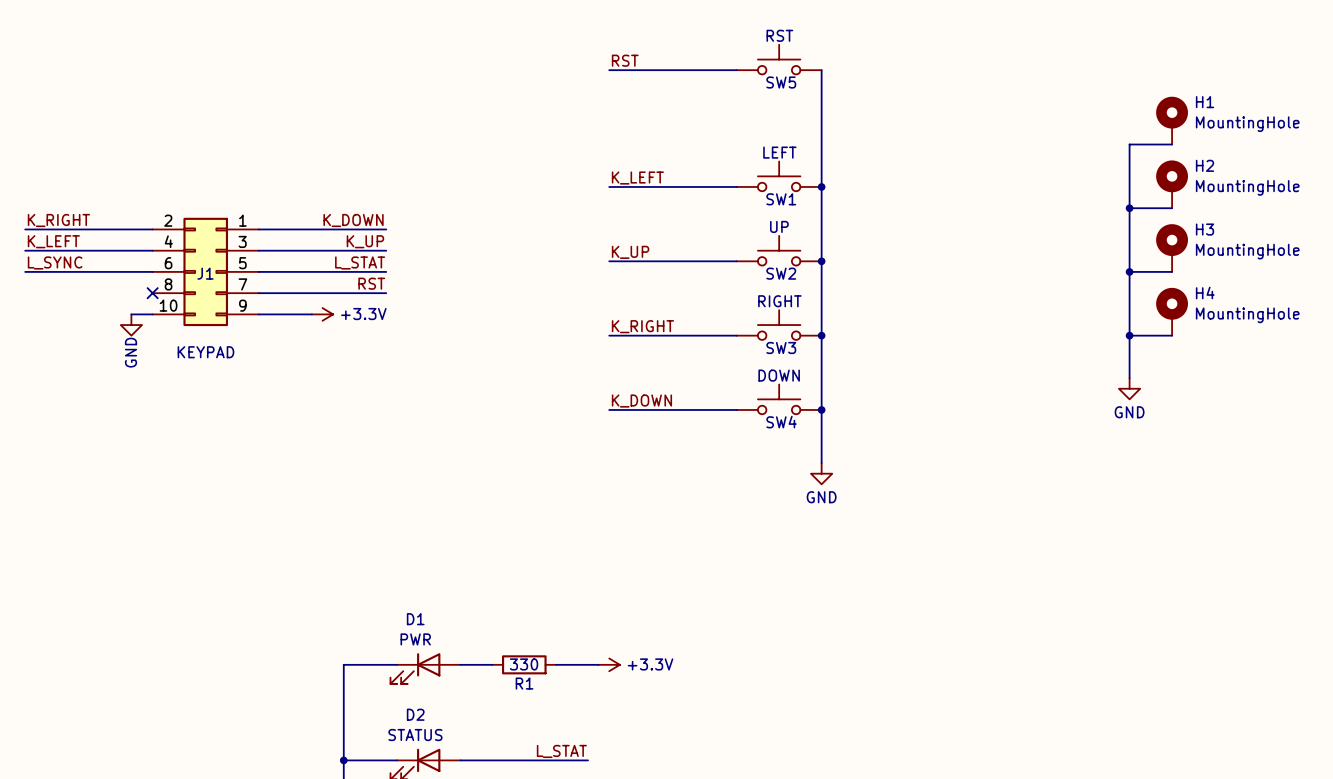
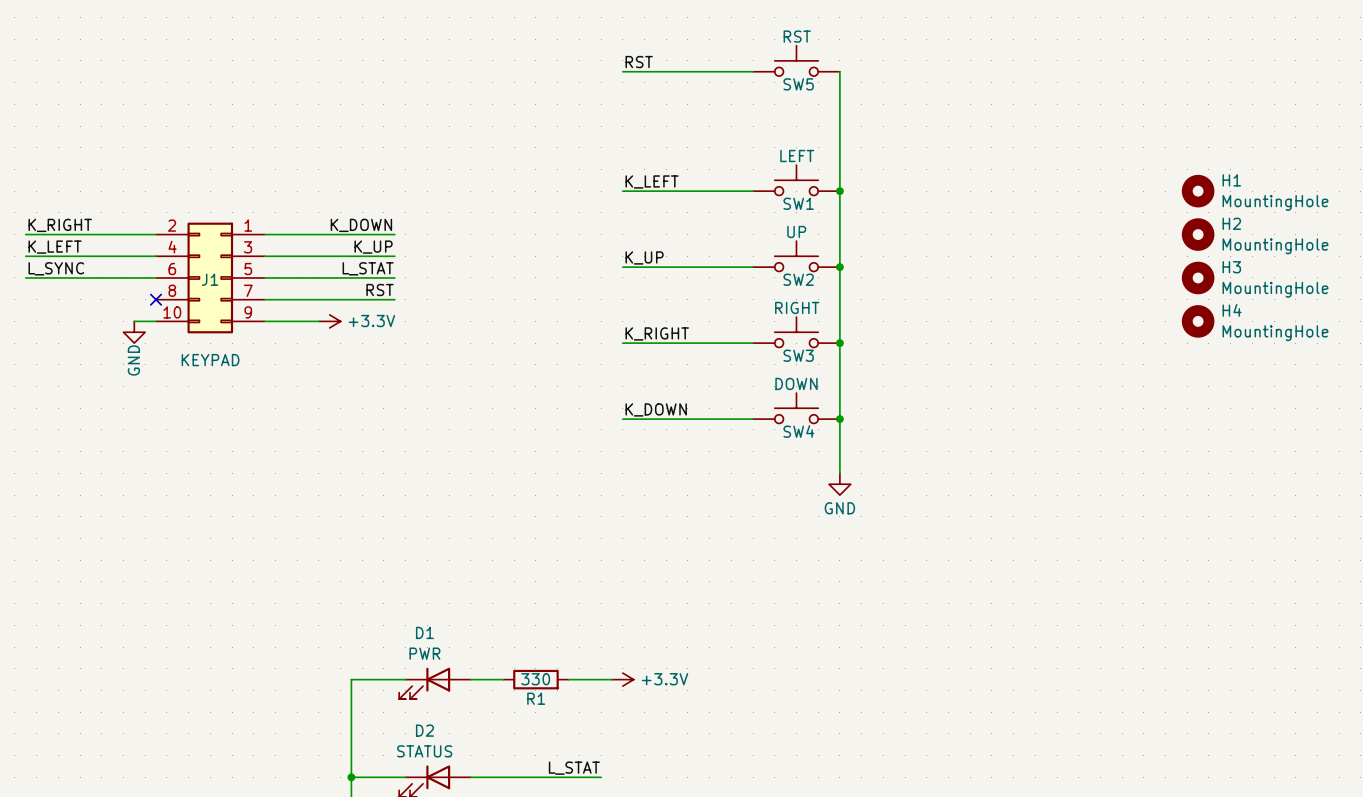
H1 symbol: [1156, 96, 1188, 145] -> [1181, 174, 1215, 208]
wire: (1172, 144) (1129, 144) (1129, 378) -> none
H2 symbol: [1156, 160, 1188, 209] -> [1181, 218, 1215, 251]
wire: (1129, 208) (1172, 208) -> none
junction: (1129, 208) -> none
H3 symbol: [1156, 224, 1188, 272] -> [1181, 261, 1215, 295]
wire: (1129, 271) (1172, 271) -> none
junction: (1129, 271) -> none
H4 symbol: [1156, 287, 1188, 336] -> [1181, 305, 1215, 338]
wire: (1129, 335) (1172, 335) -> none
junction: (1129, 335) -> none
power symbol: GND (1129, 388) -> none

